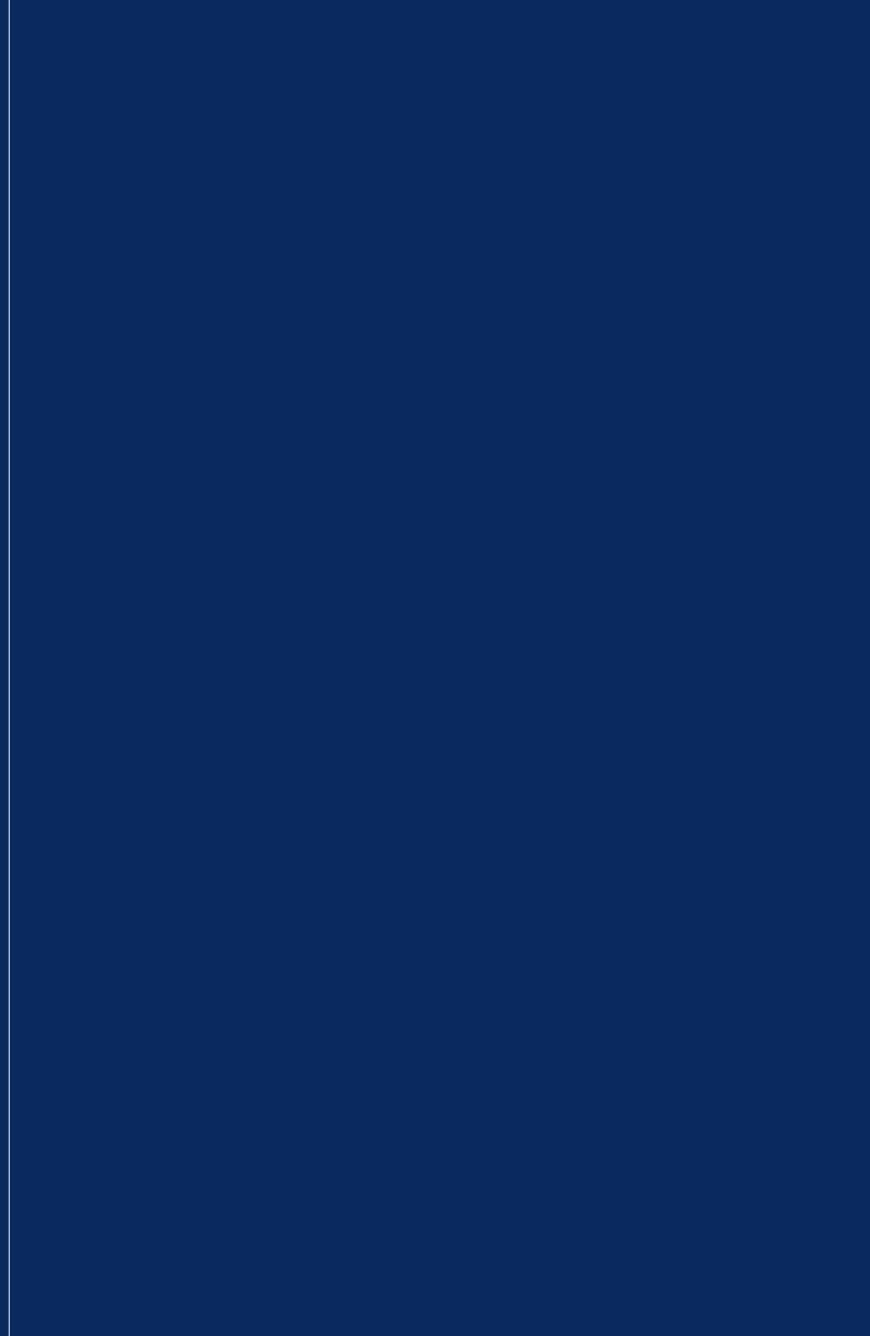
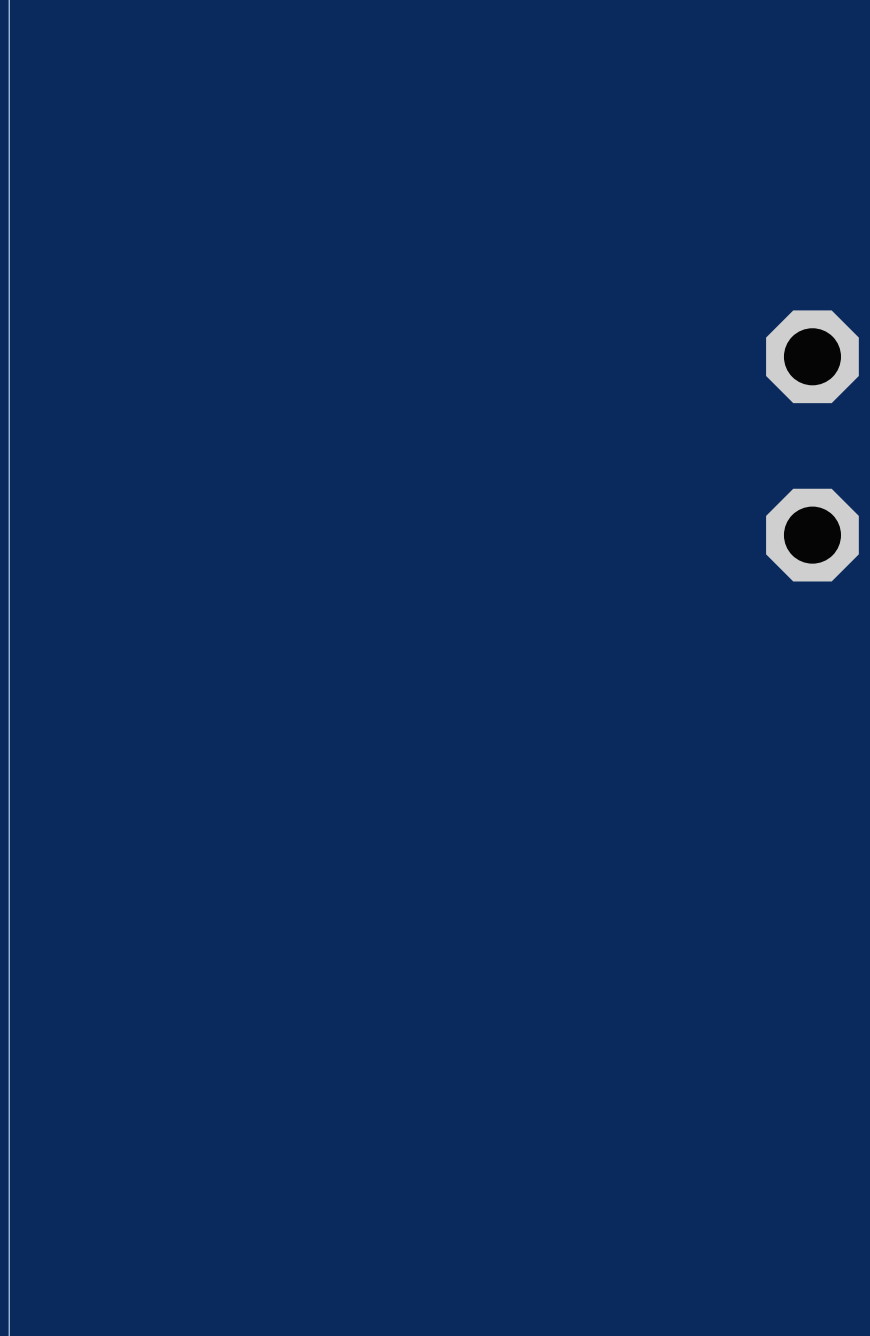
part: none -> (812, 445)

